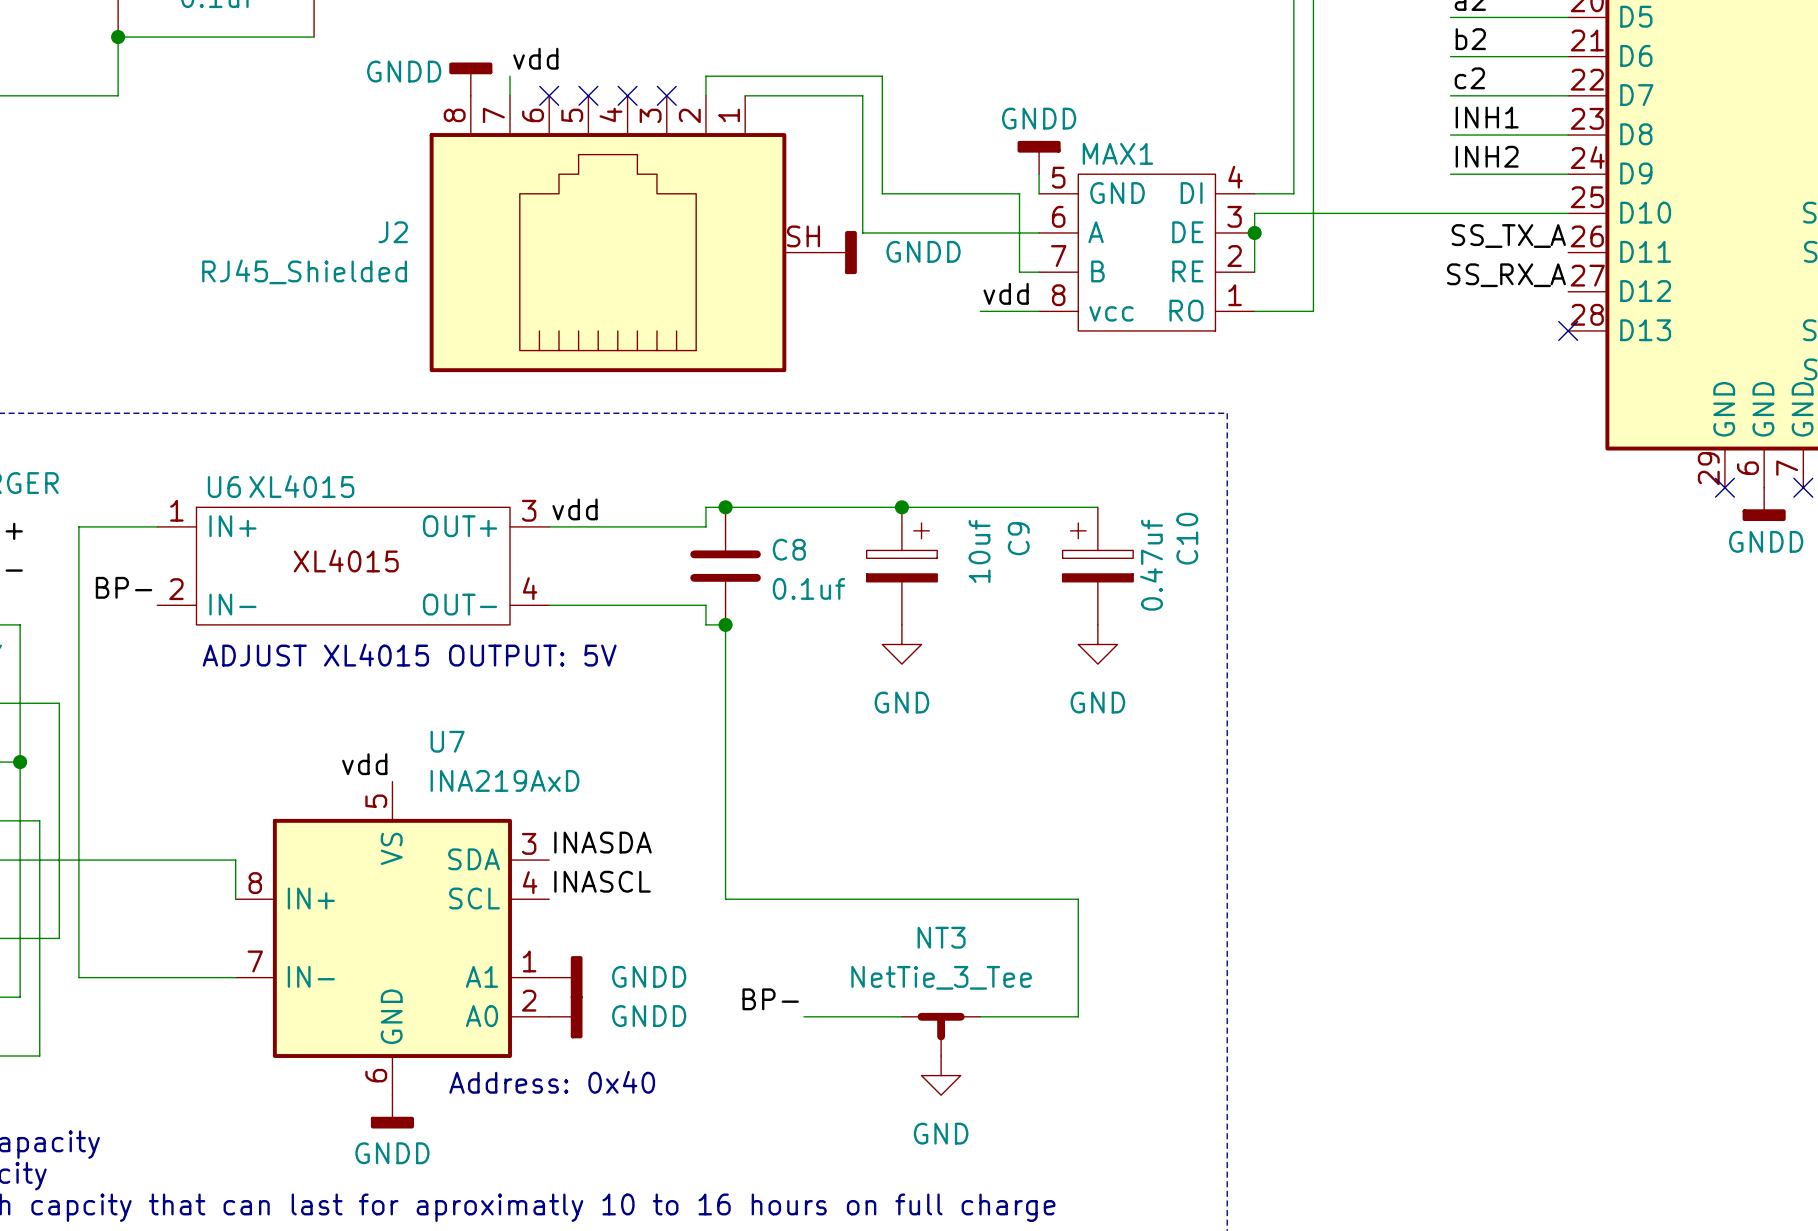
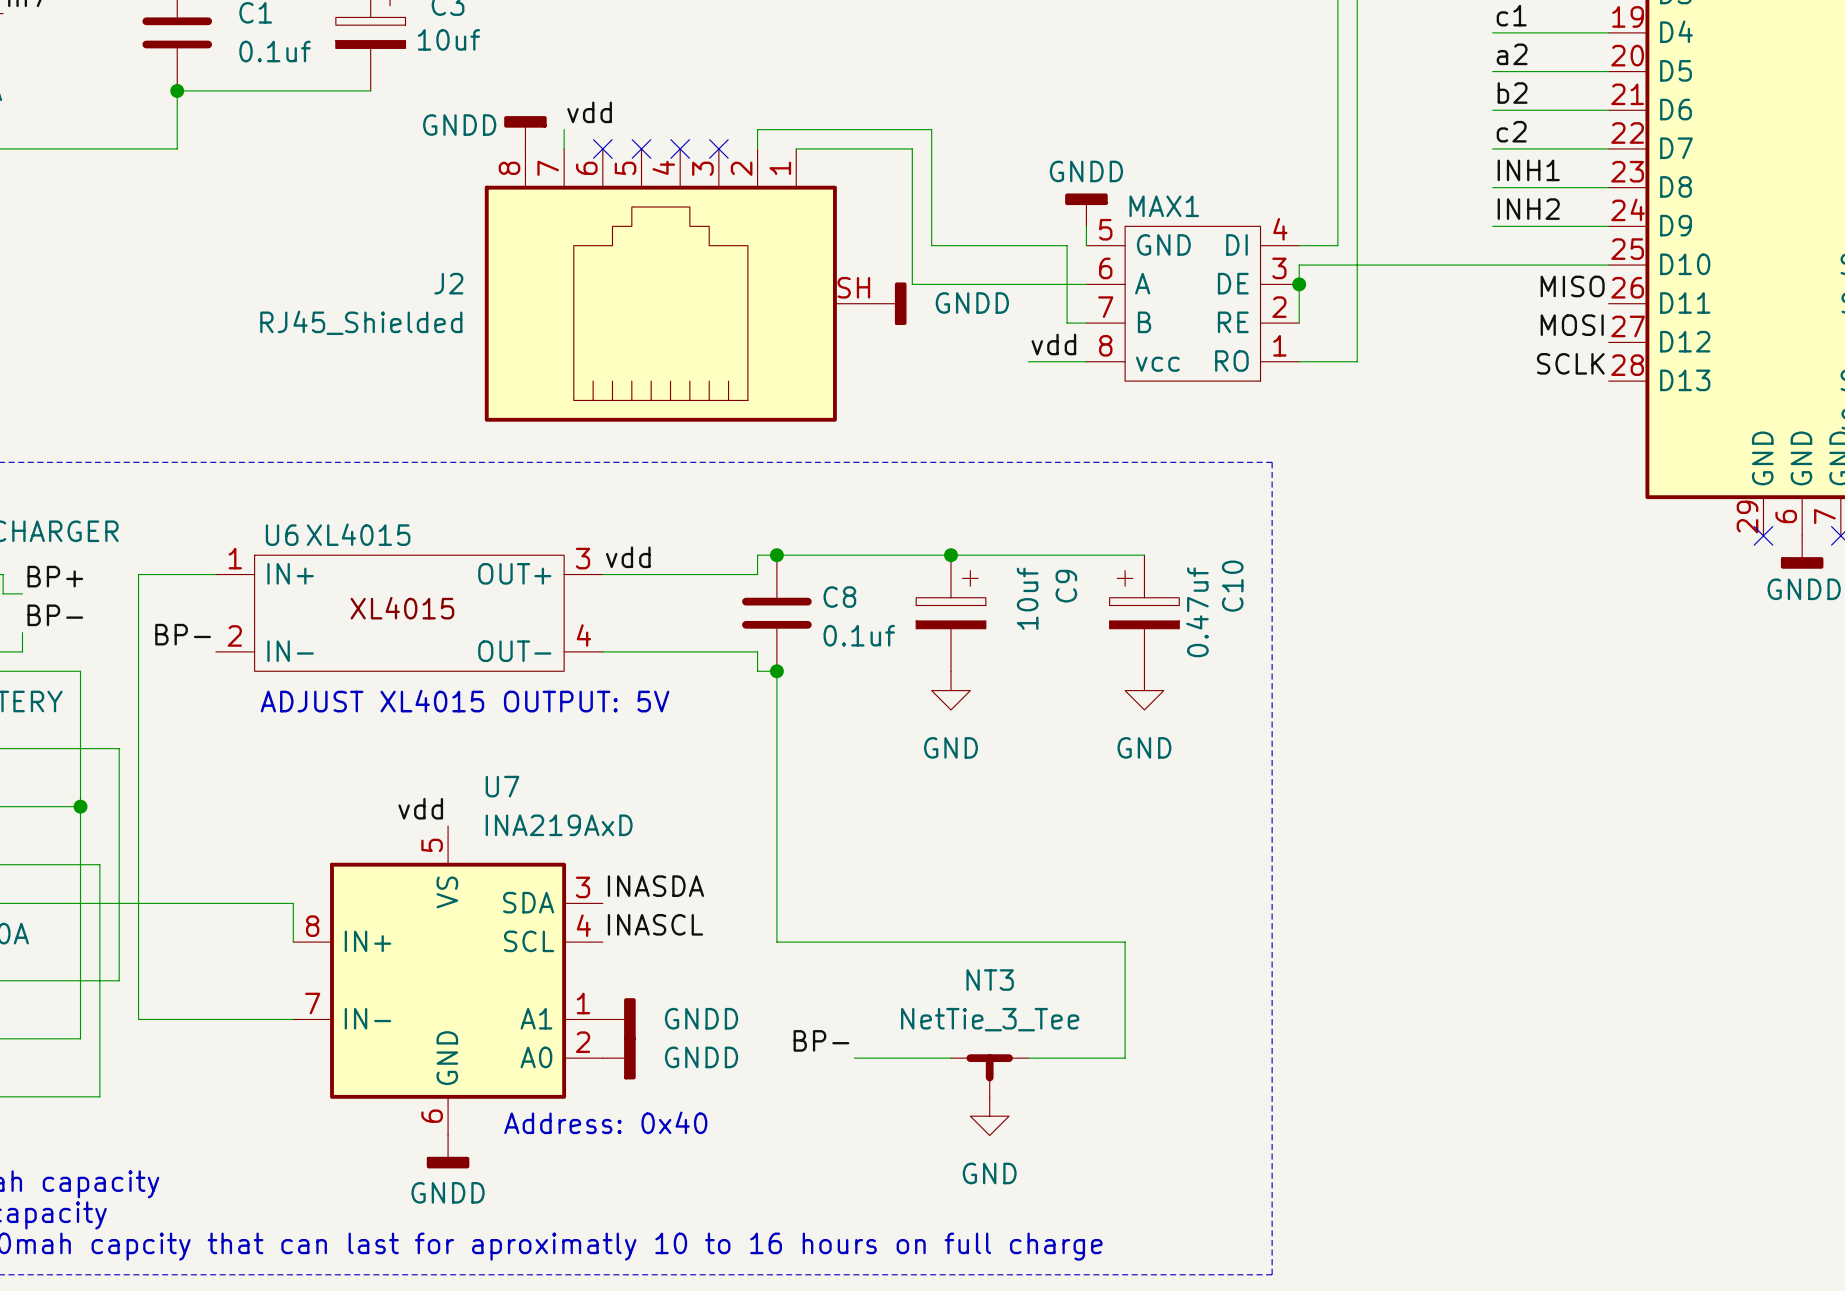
label: SS_TX_A (1508, 236) -> MISO (1572, 286)
label: SS_RX_A (1506, 275) -> MOSI (1572, 325)
label: none -> SCLK (1570, 363)
no-connect mark: (1568, 330) -> none

